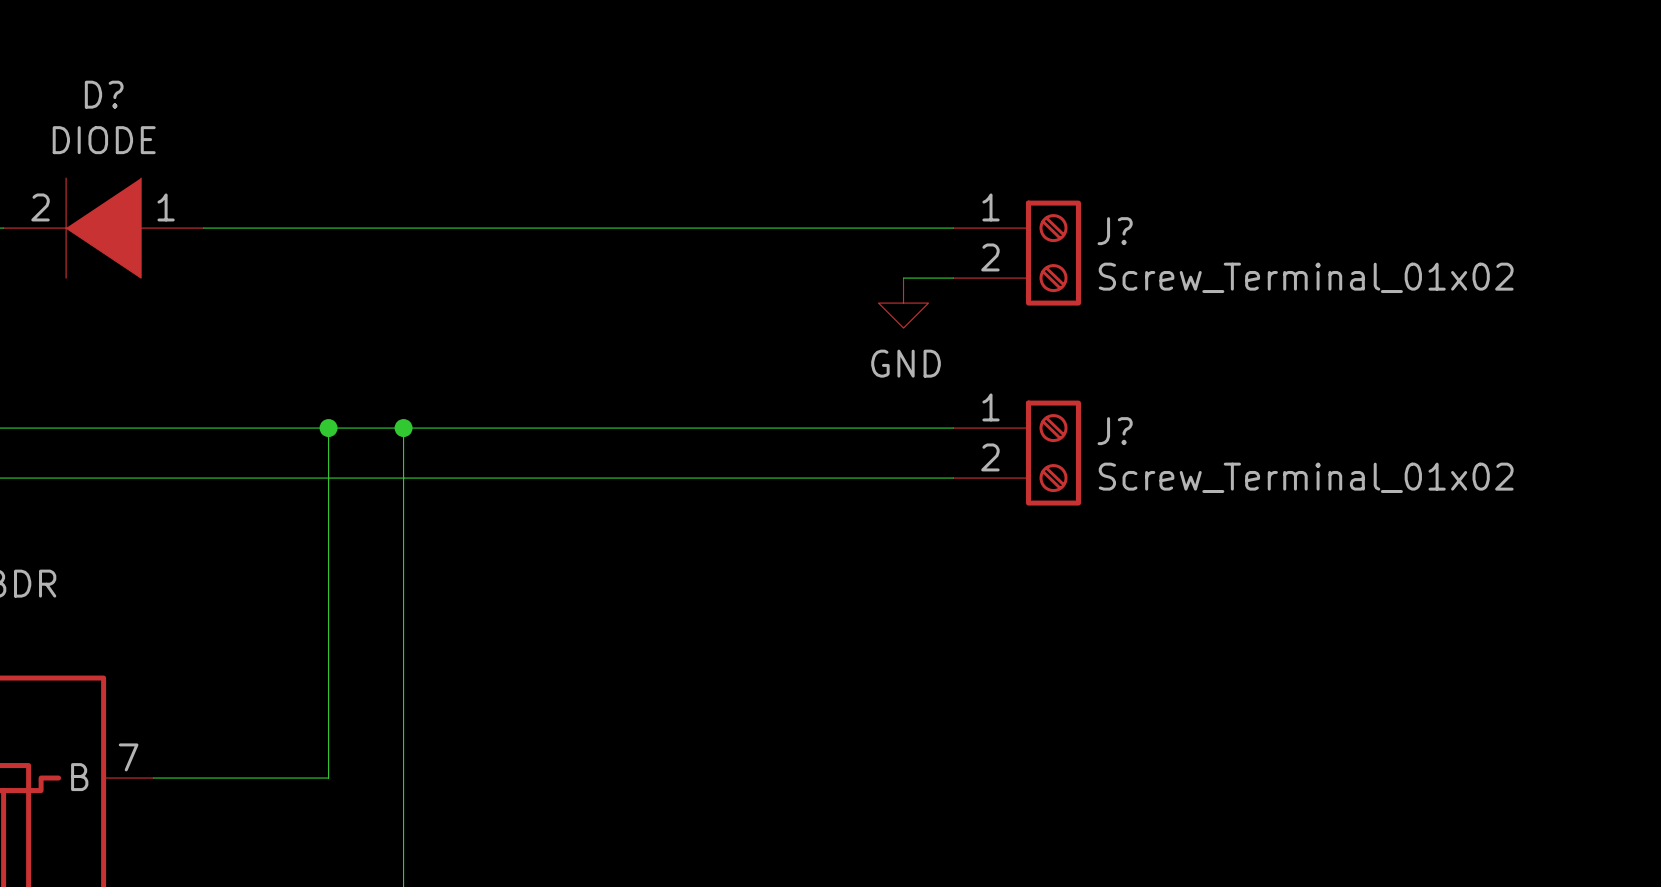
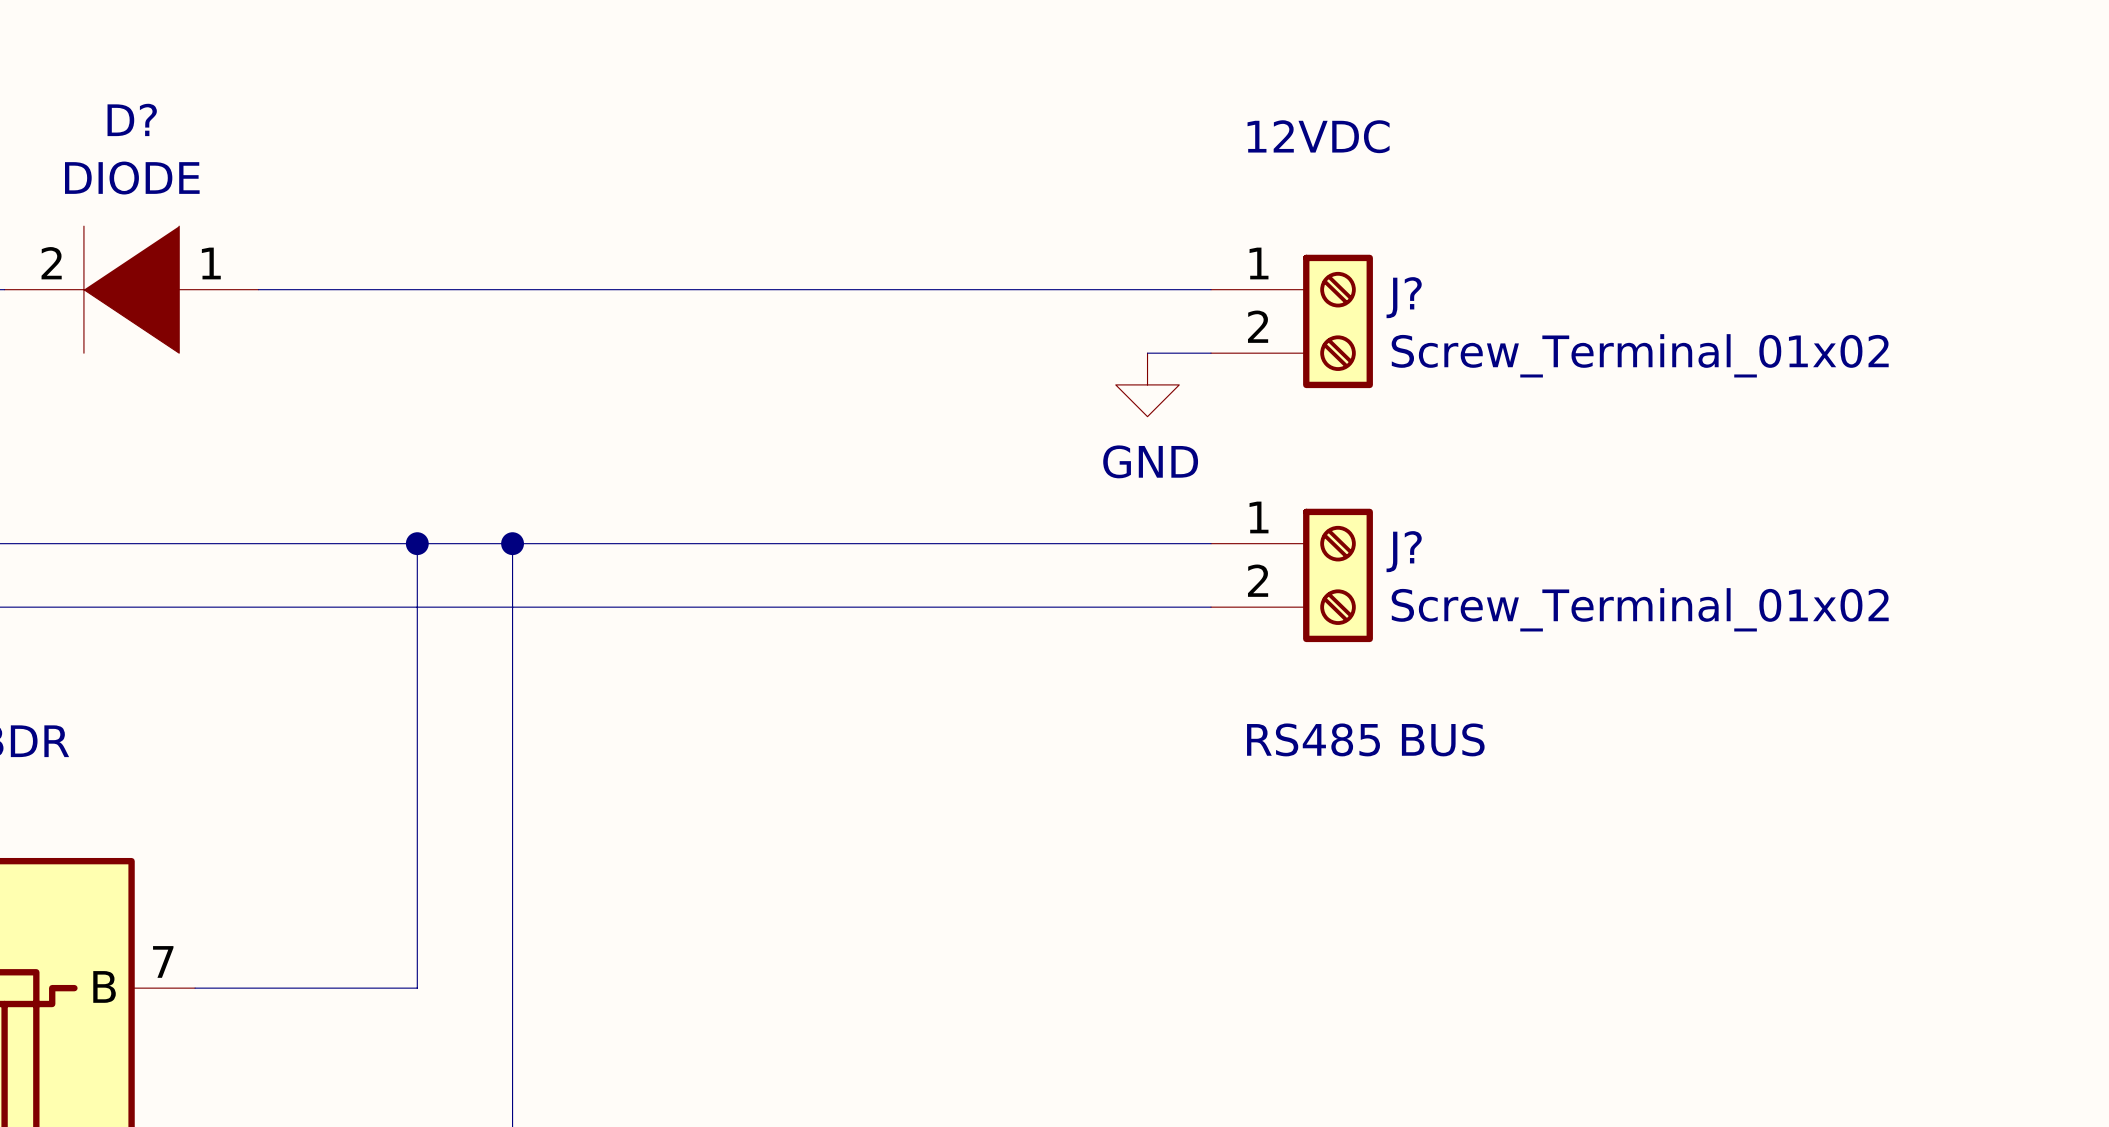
text: none -> 12VDC (1318, 136)
text: none -> RS485 BUS (1365, 739)

